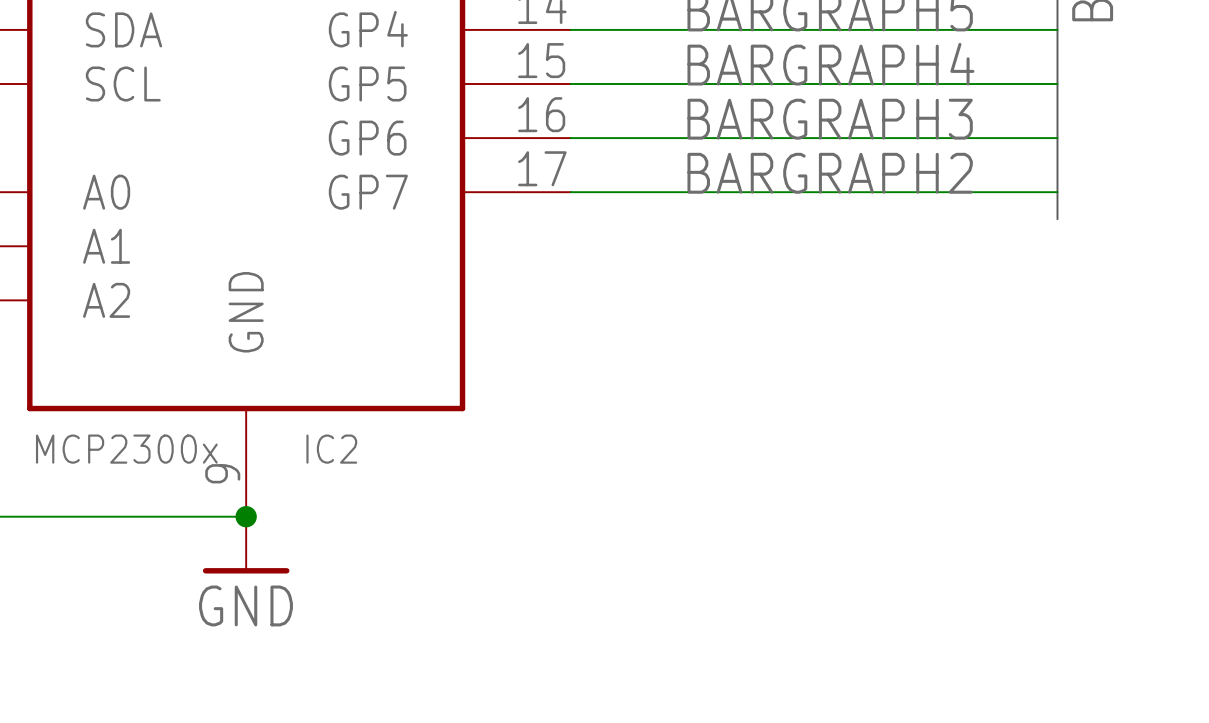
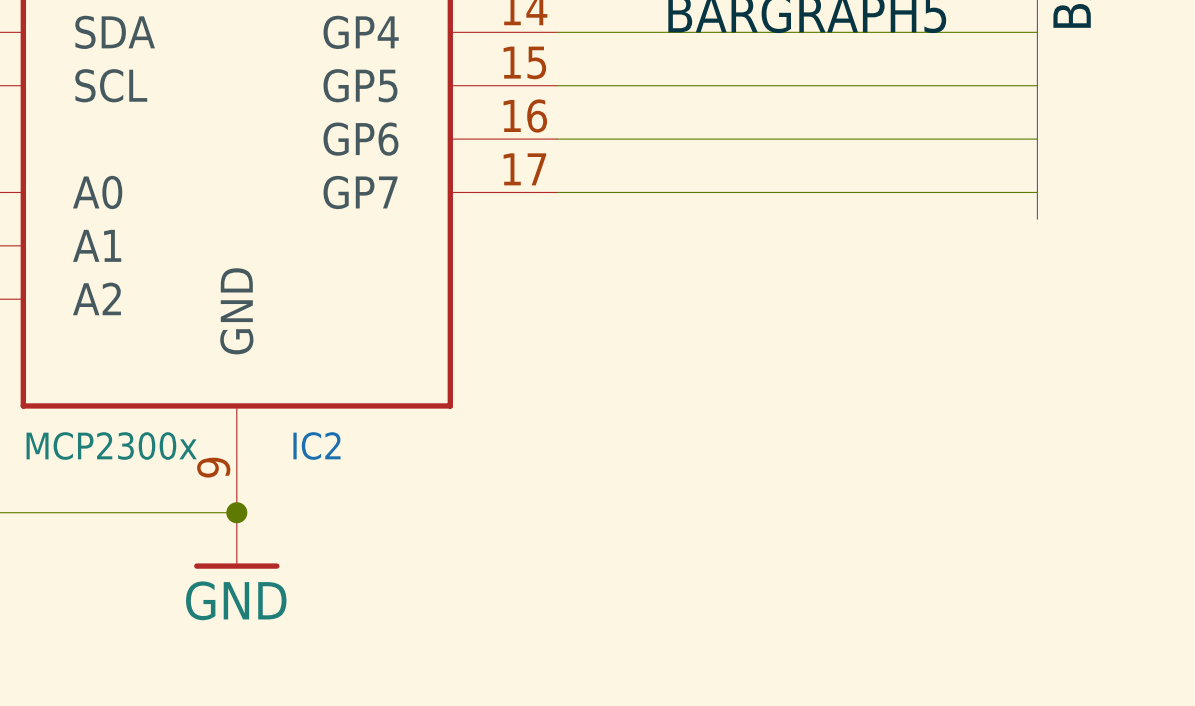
label: BARGRAPH4 (830, 64) -> none
label: BARGRAPH3 (830, 119) -> none
label: BARGRAPH2 (830, 173) -> none

